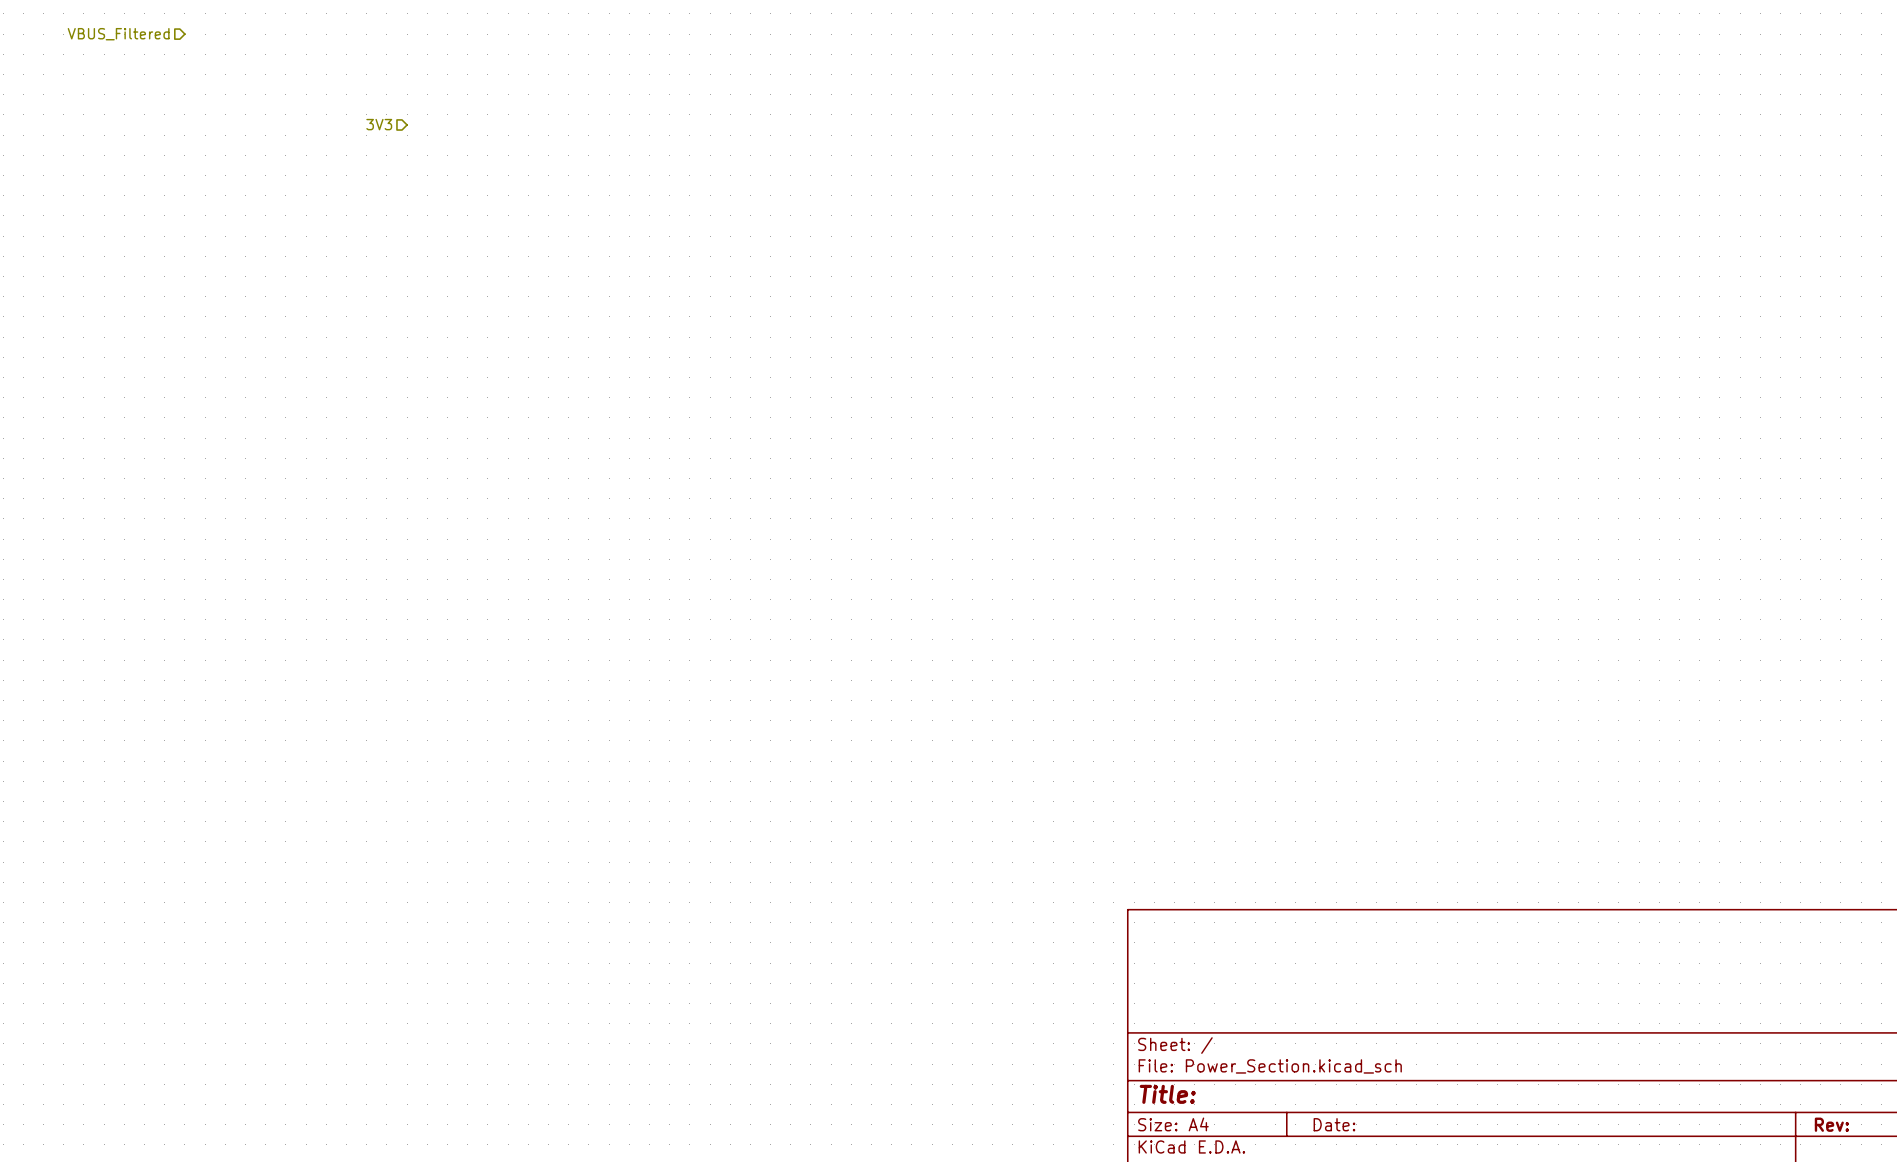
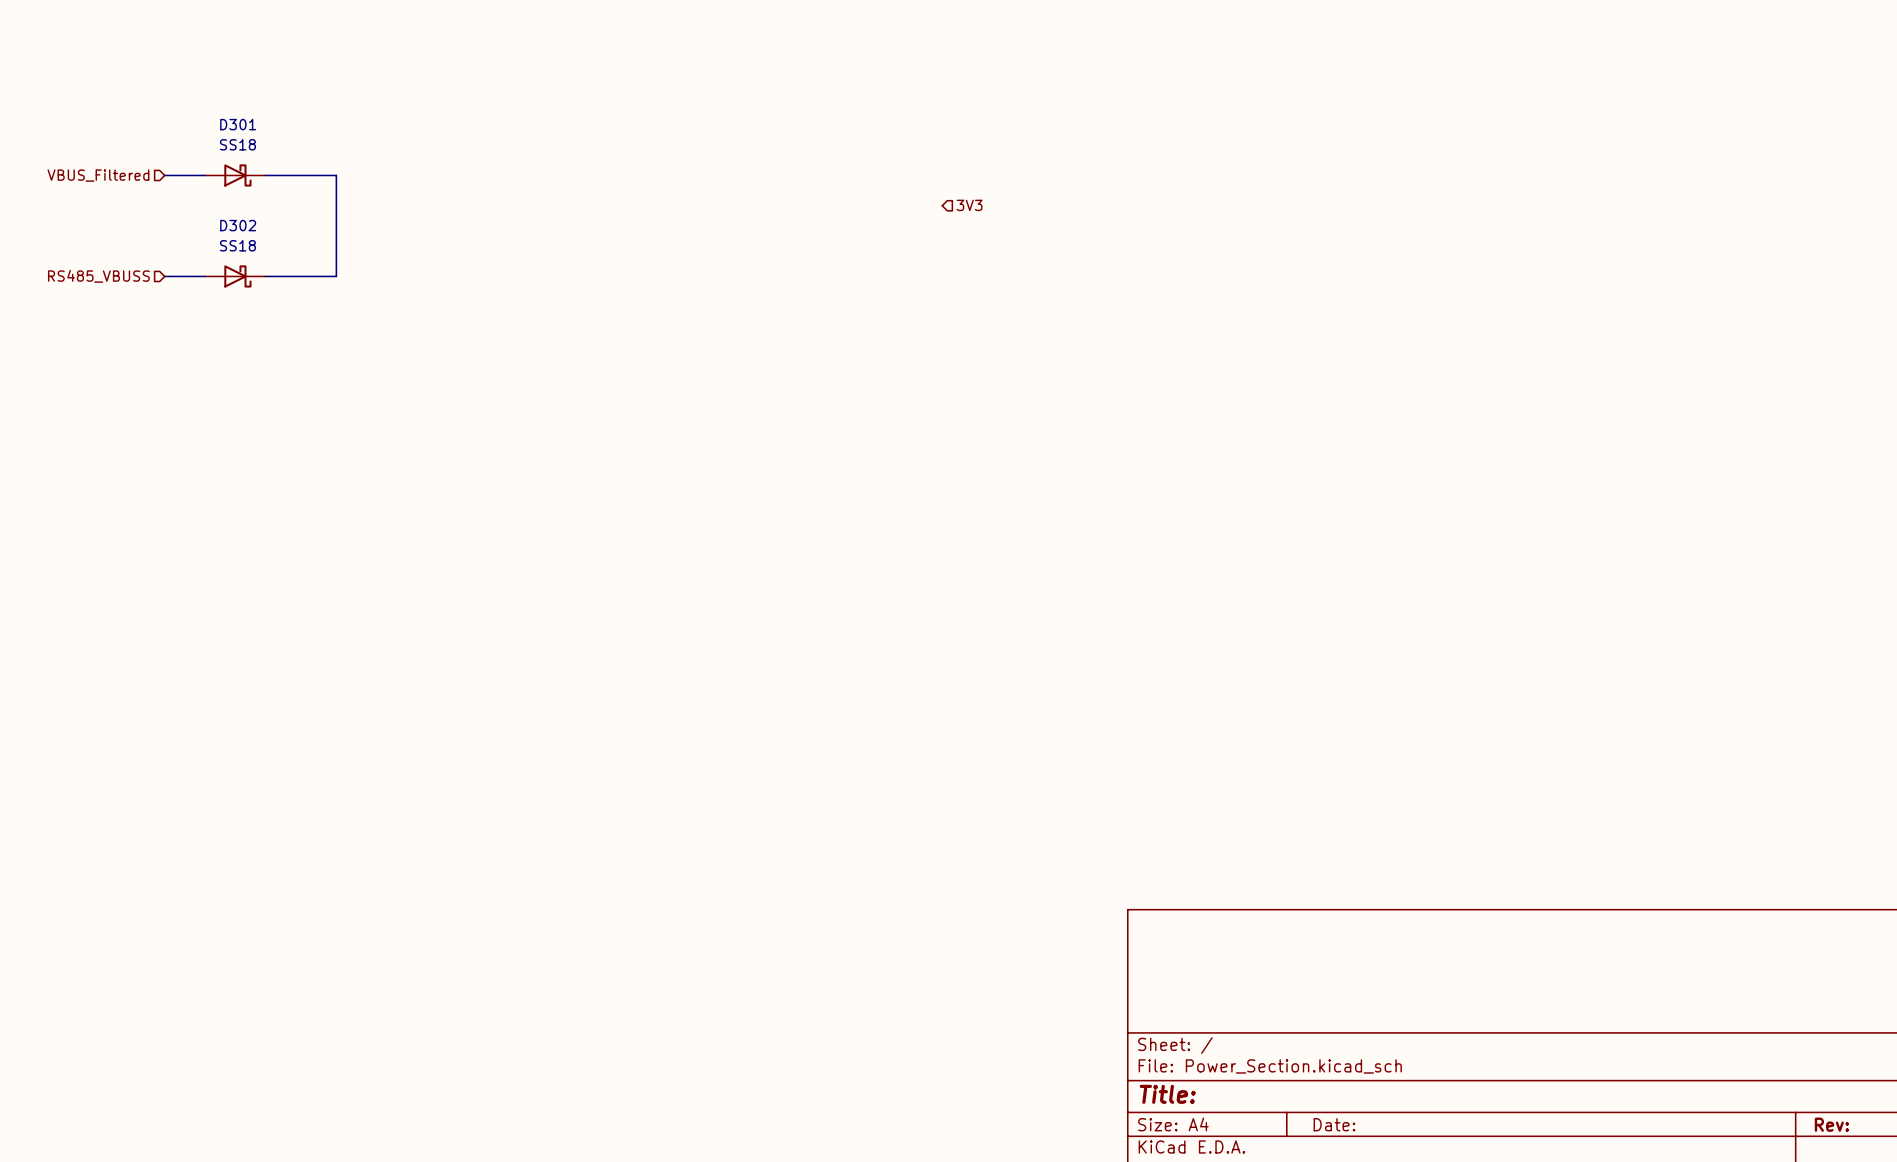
hierarchical label position: VBUS_Filtered (118, 34) -> VBUS_Filtered (98, 175)
hierarchical label: 3V3 (379, 124) -> none
wire: none -> (164, 175) (205, 175)
D301: none -> SS18 (235, 175)
wire: none -> (265, 175) (336, 175) (336, 276) (265, 276)
hierarchical label: none -> 3V3 (969, 205)
hierarchical label: none -> RS485_VBUSS (98, 276)
wire: none -> (164, 276) (205, 276)
D302: none -> SS18 (235, 276)

